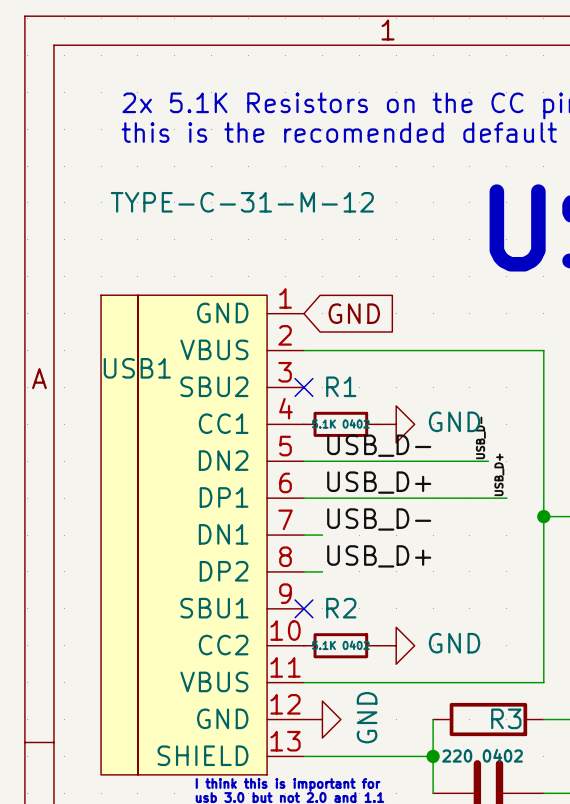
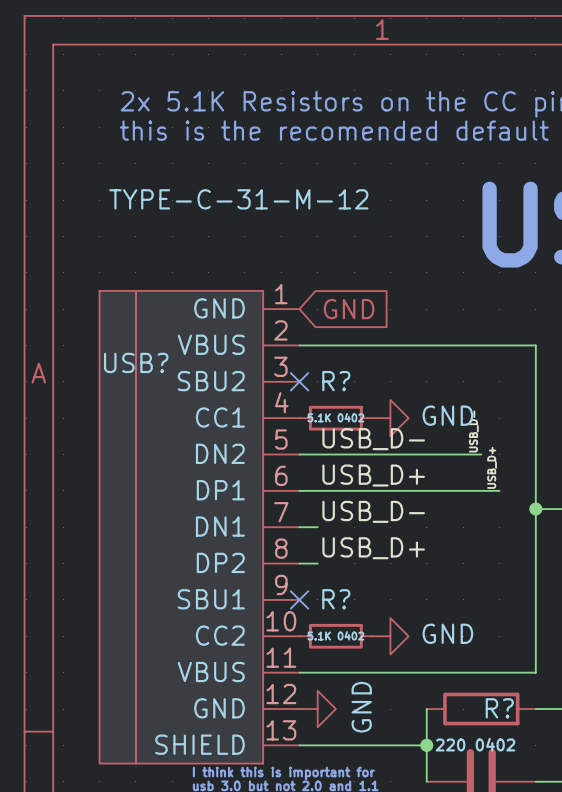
USB1 name: USB1 (137, 368) -> USB? (136, 362)
R1 name: R1 (341, 386) -> R? (336, 381)
R2 name: R2 (341, 608) -> R? (336, 599)
R3 name: R3 (506, 718) -> R? (499, 708)

